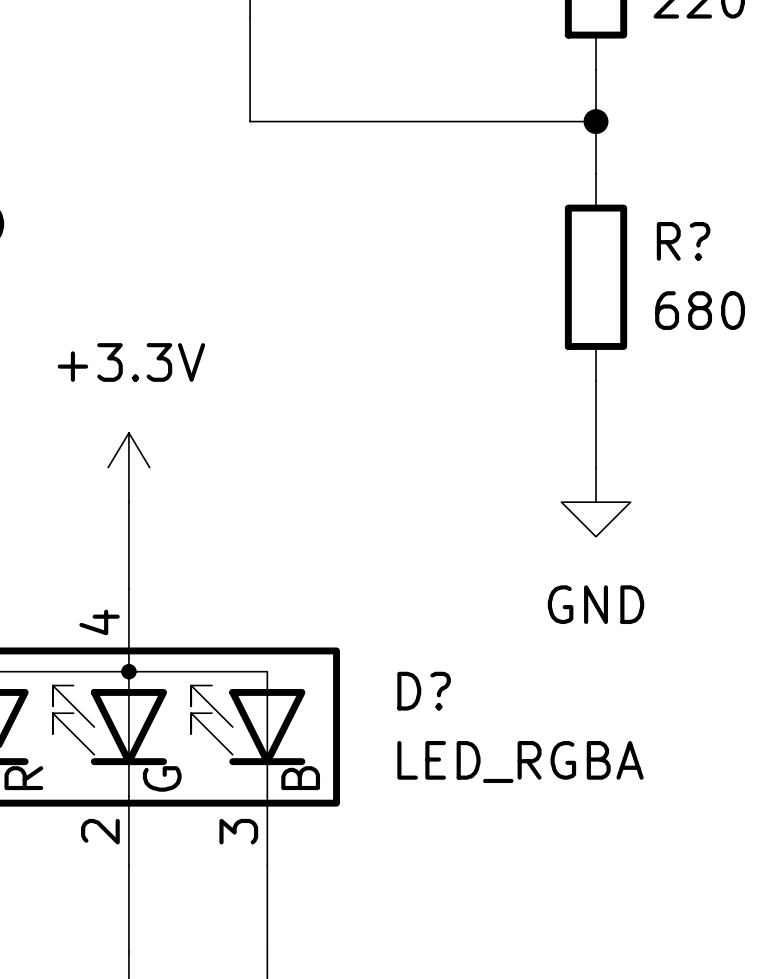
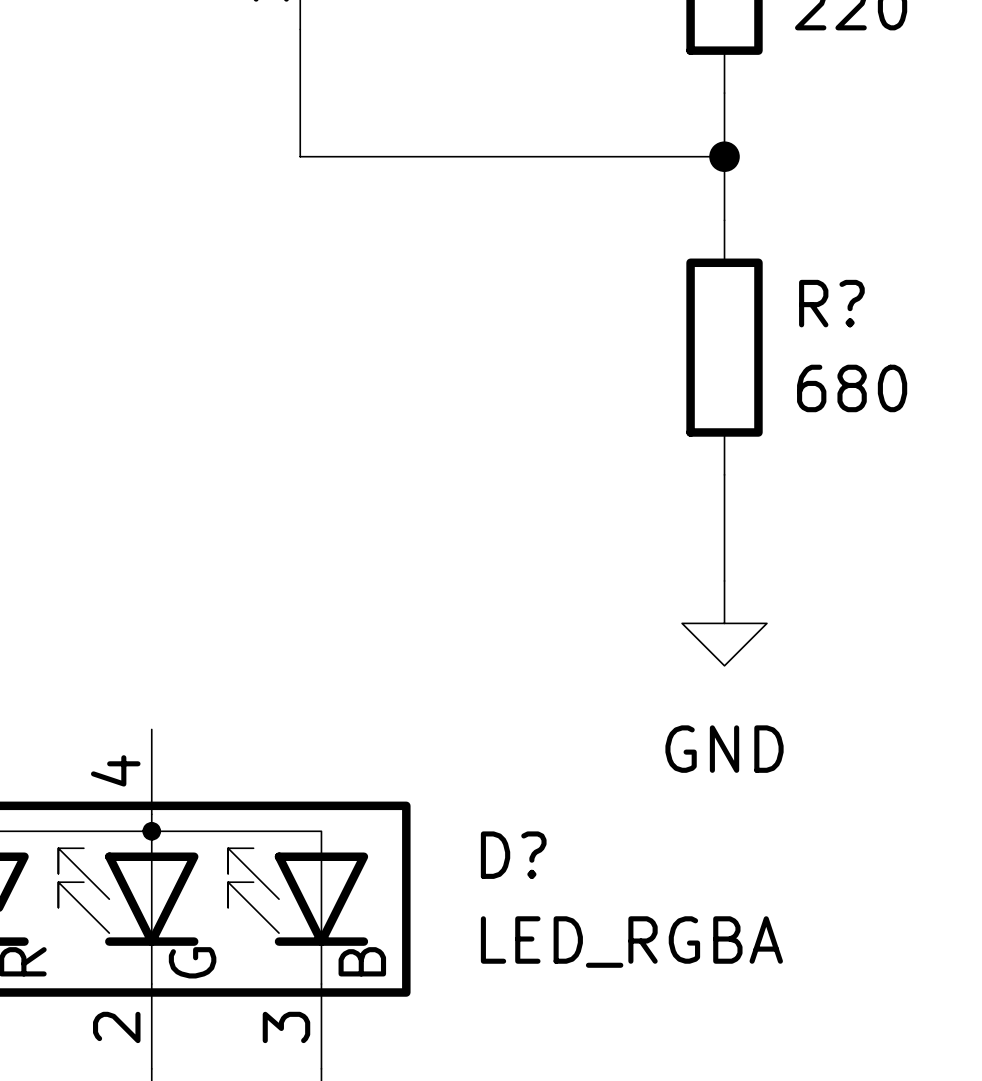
power symbol: +3.3V (128, 467) -> none
wire: (128, 502) (128, 588) -> none

